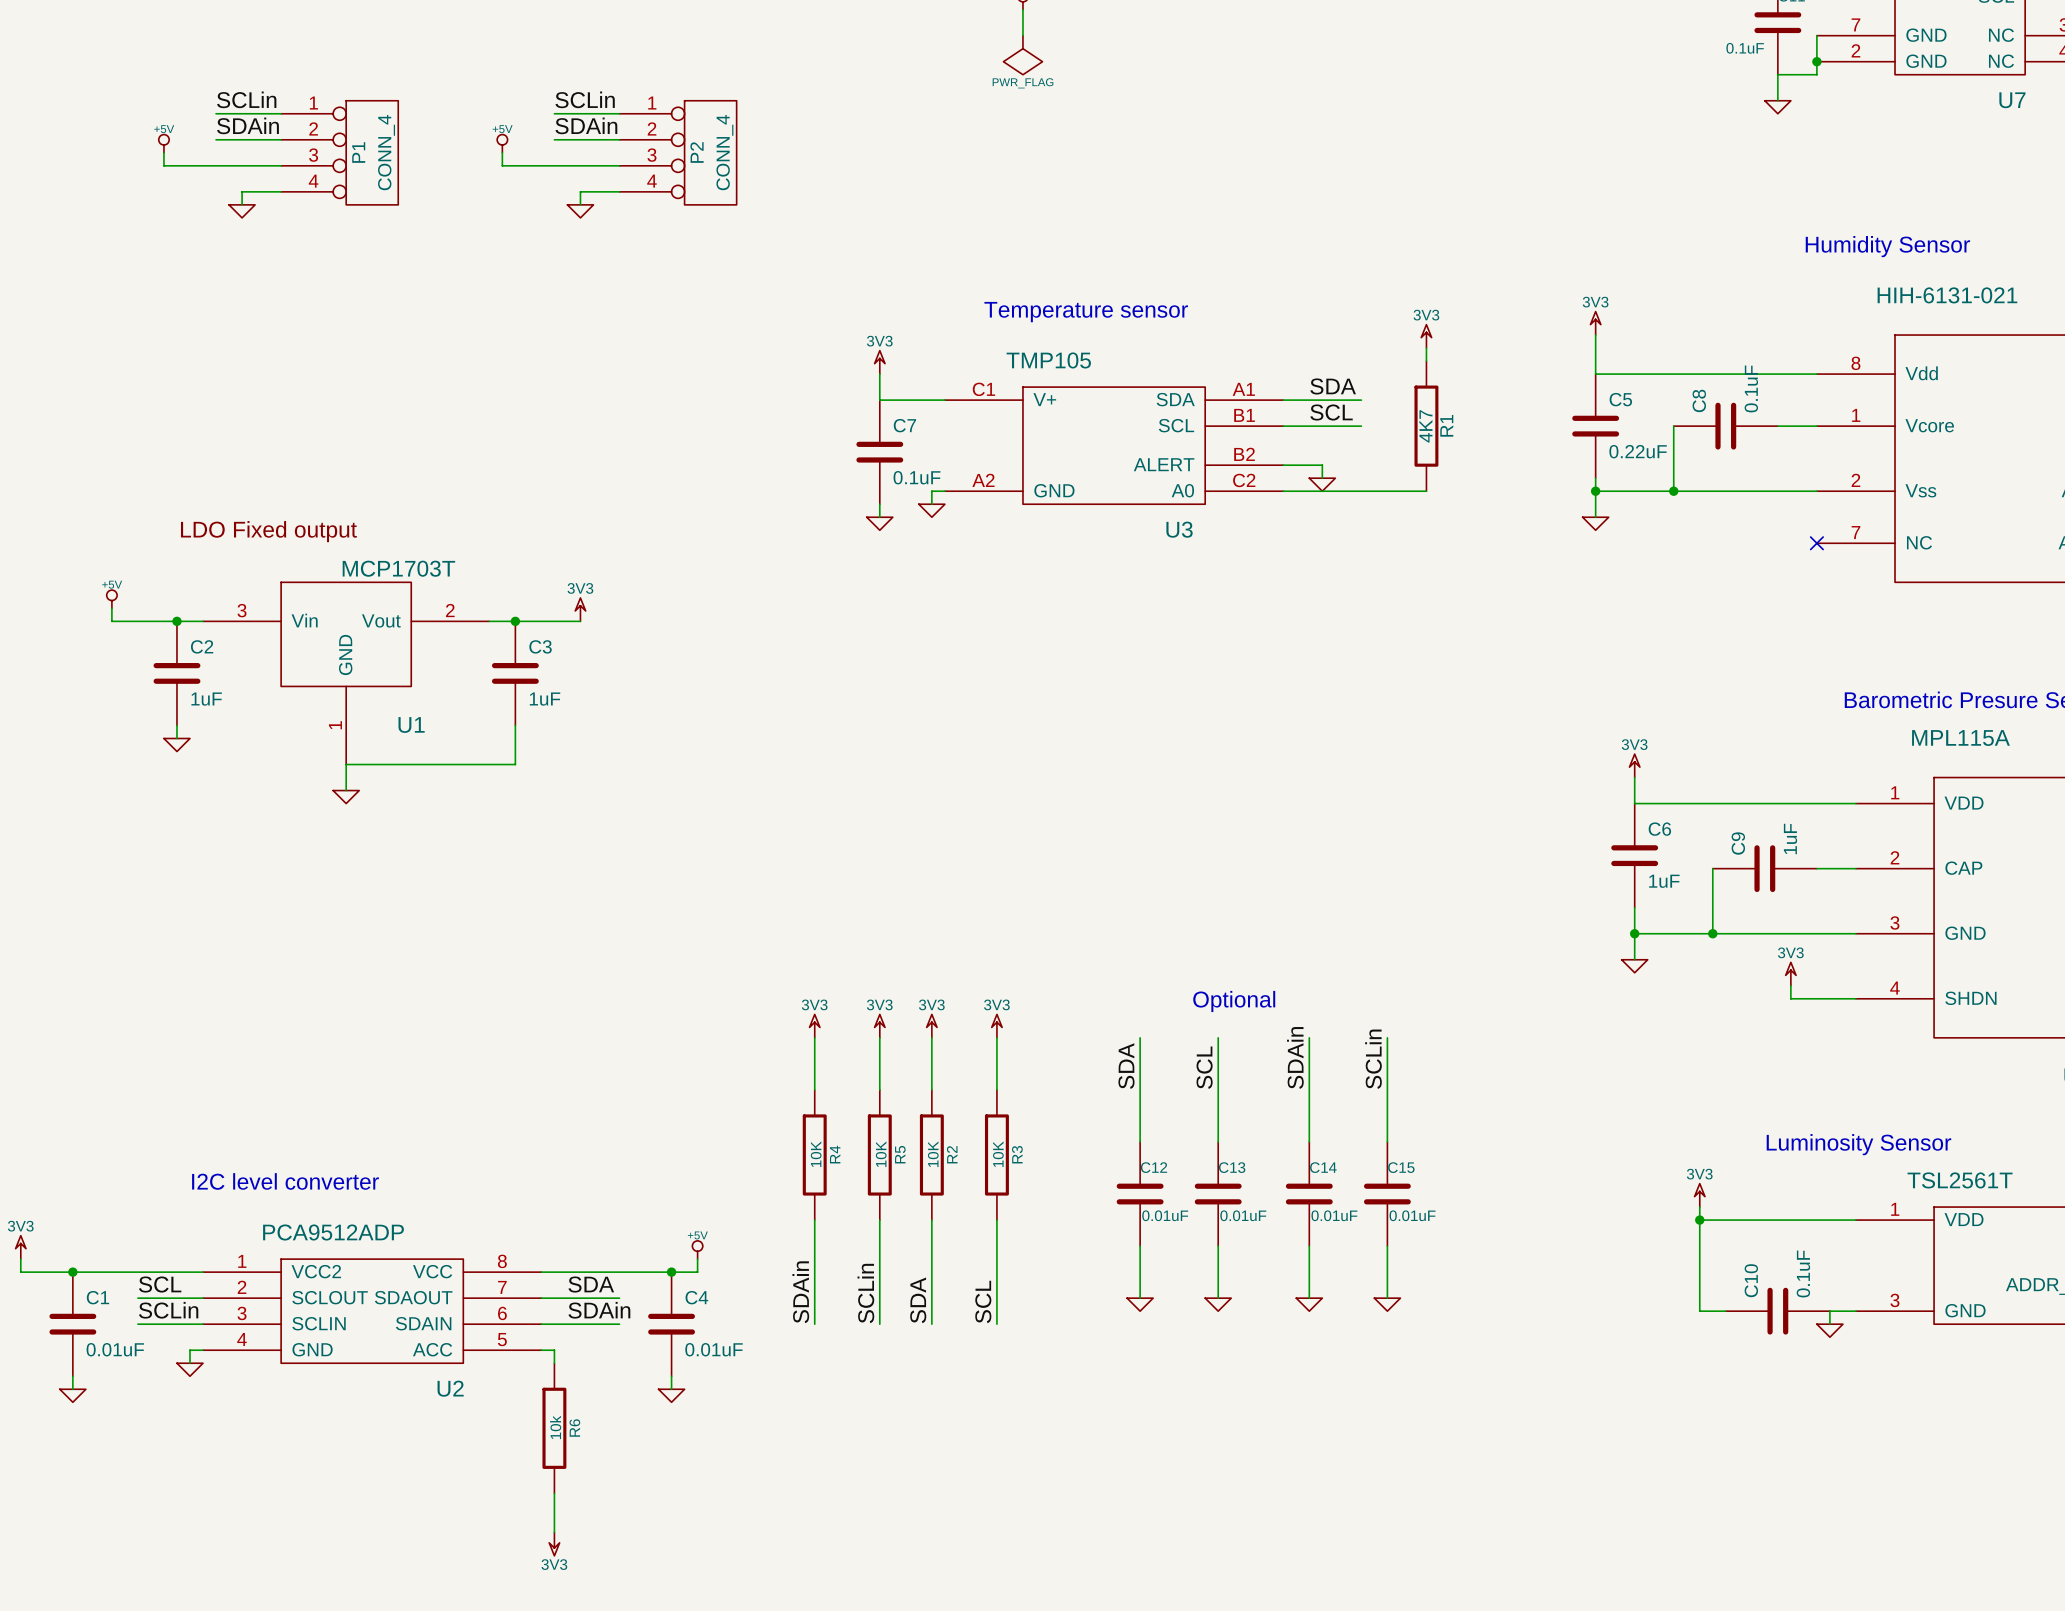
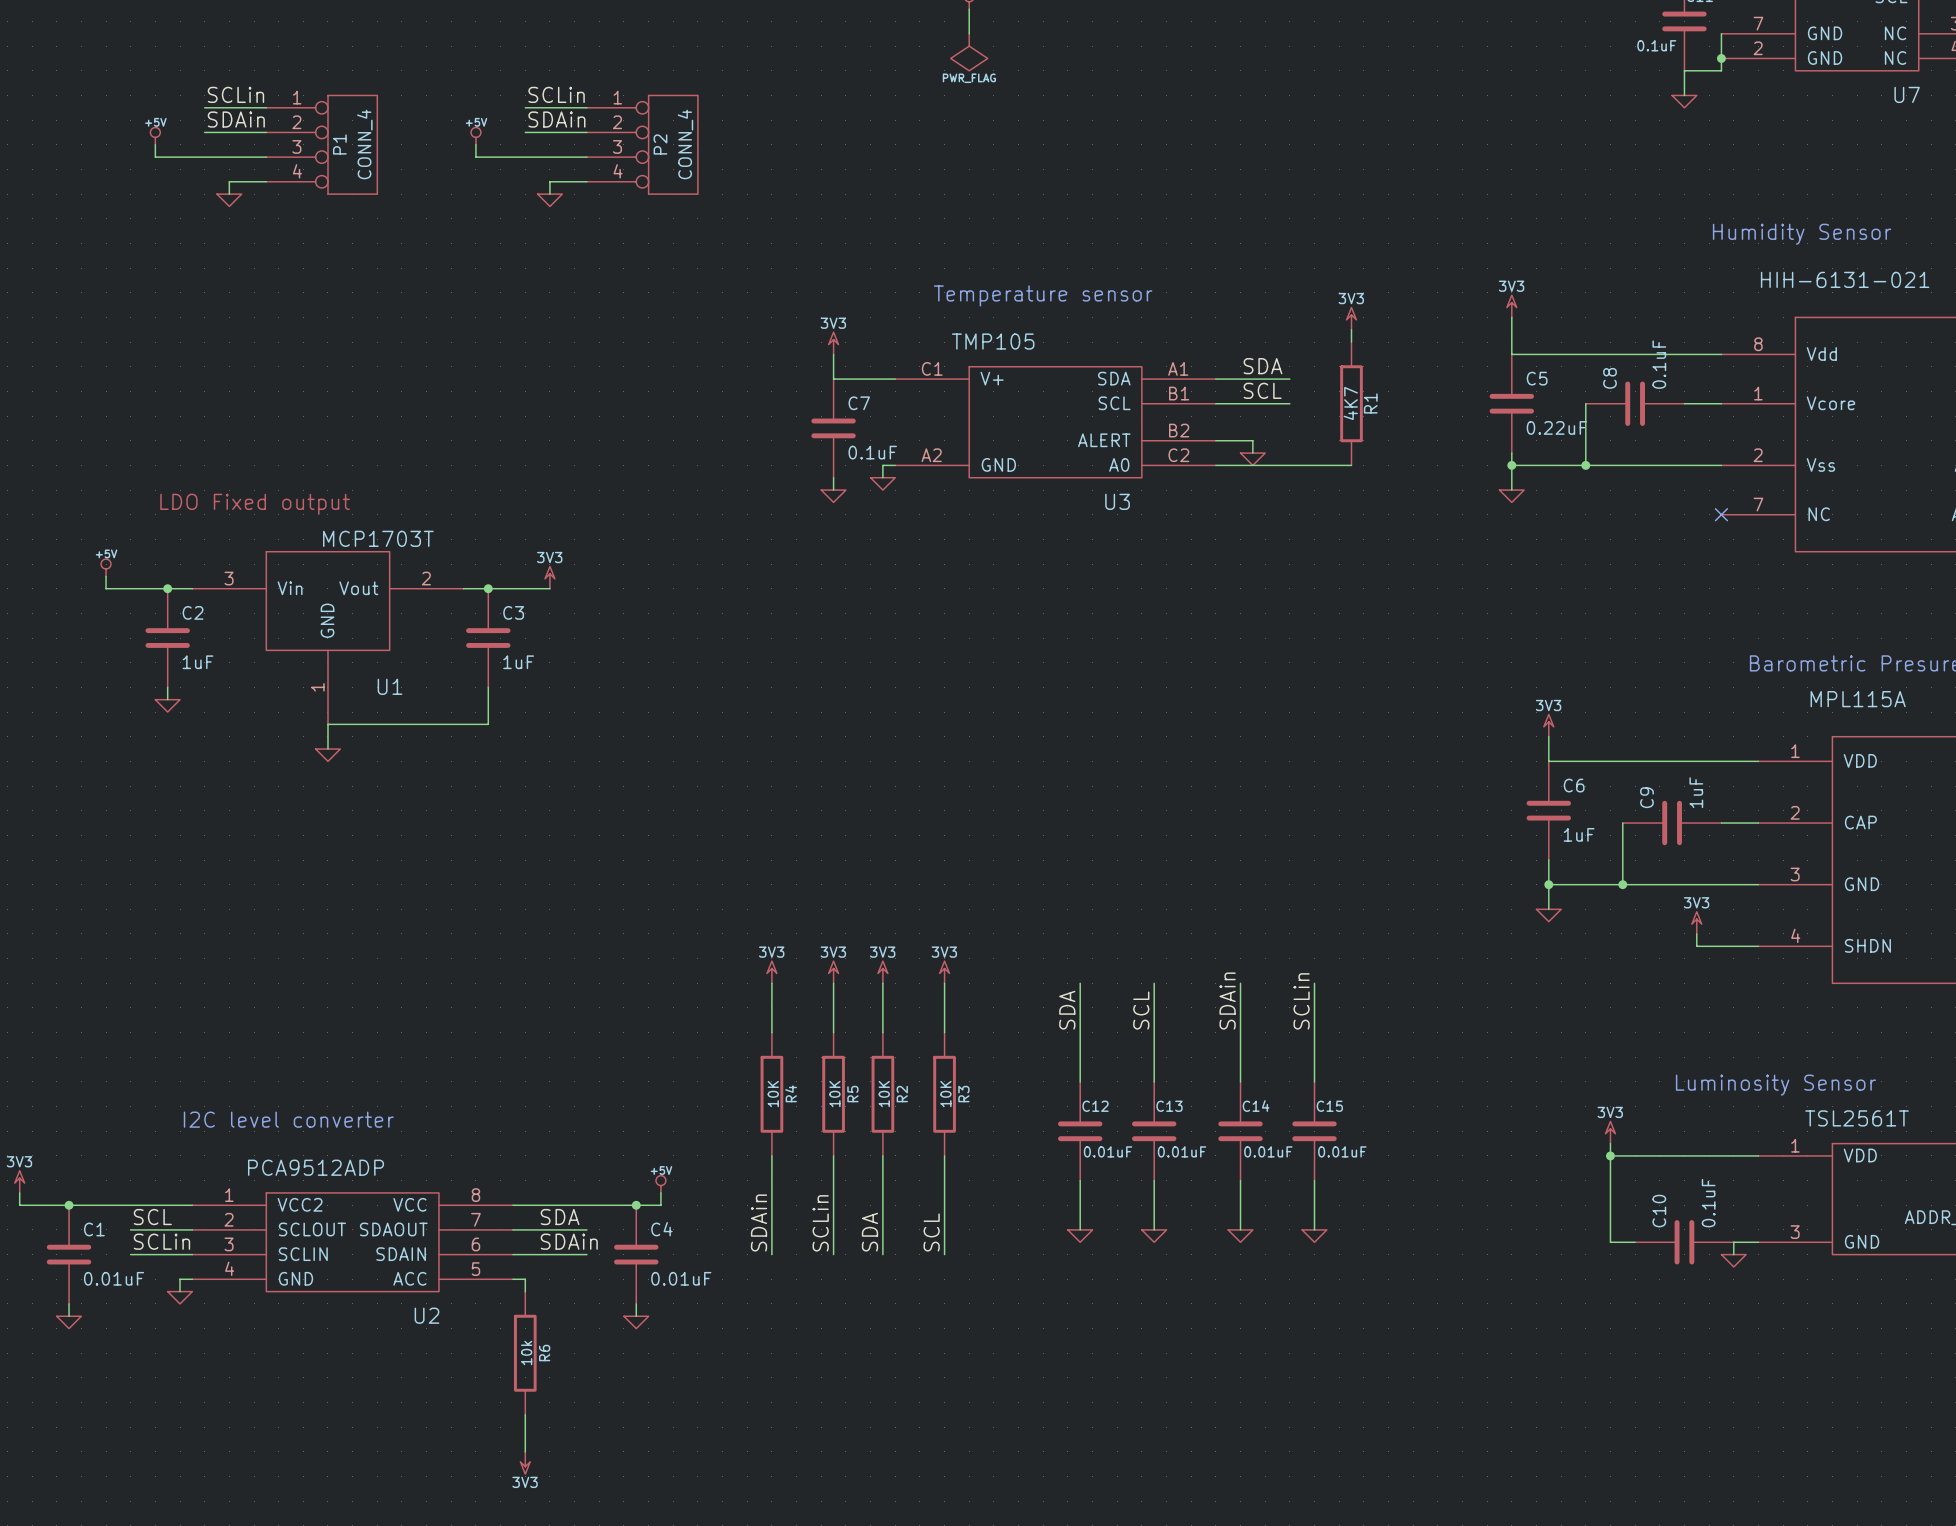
text: Optional (1234, 1001) -> none

